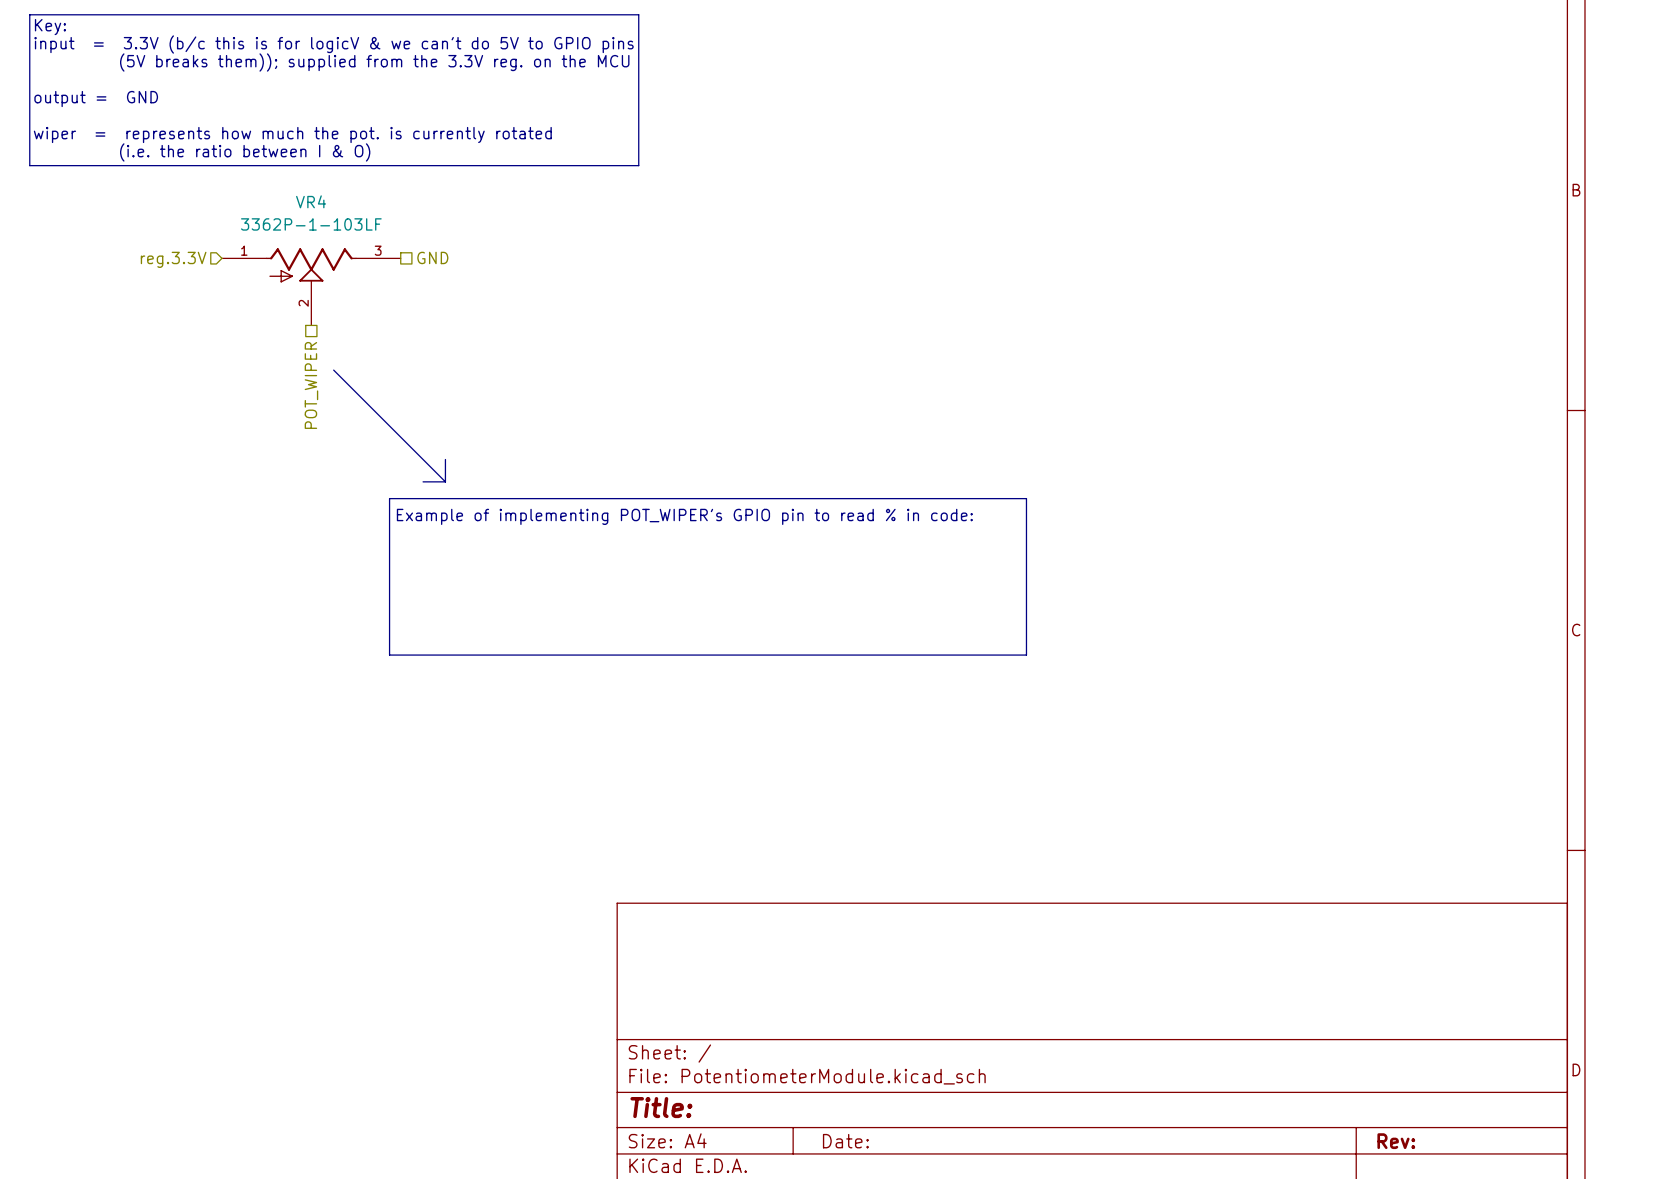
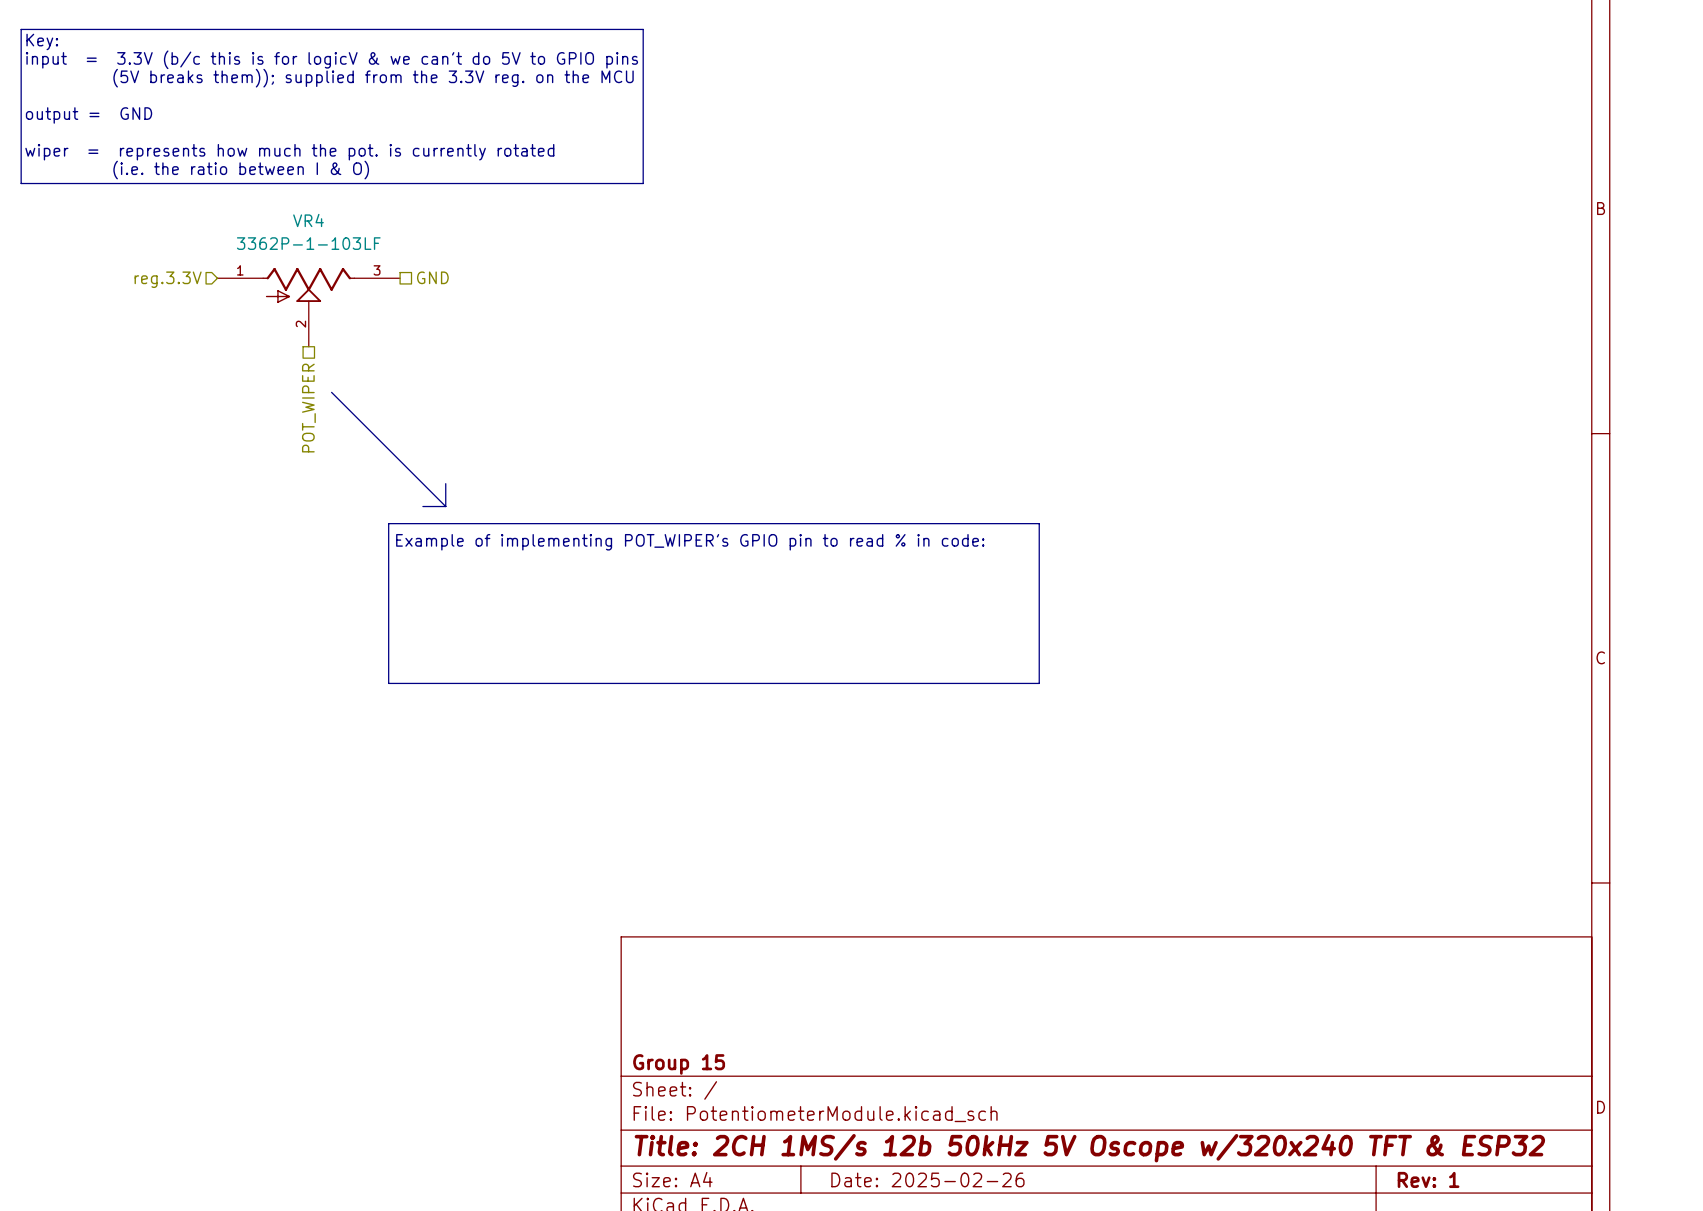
title block: none -> Group 15 (679, 1064)
title block: Title: (661, 1107) -> Title: 2CH 1MS/s 12b 50kHz 5V Oscope w/320x240 TFT & ESP32 (1089, 1148)
title block: Date: (845, 1141) -> Date: 2025-02-26 (927, 1179)
title block: Rev: (1396, 1141) -> Rev: 1 (1428, 1179)

